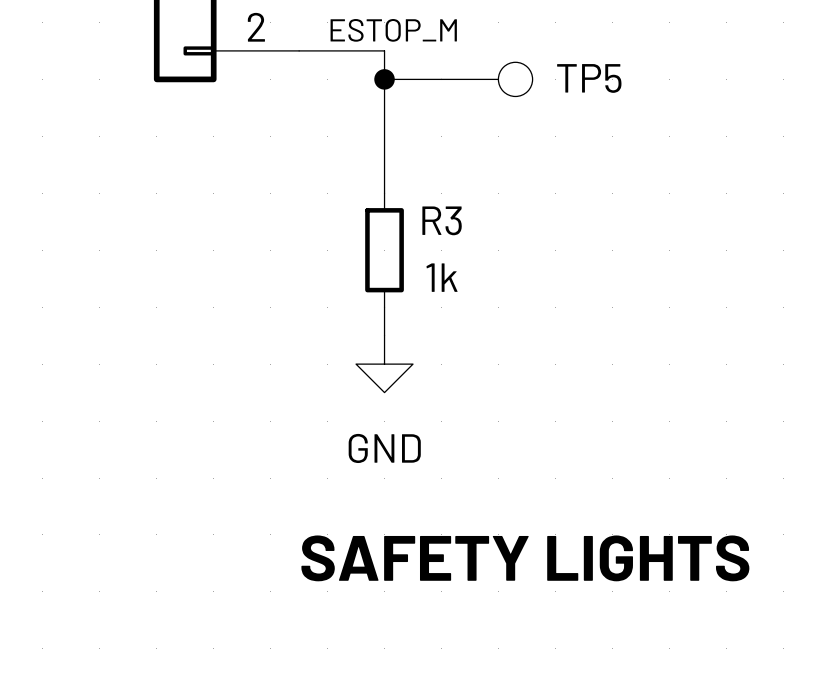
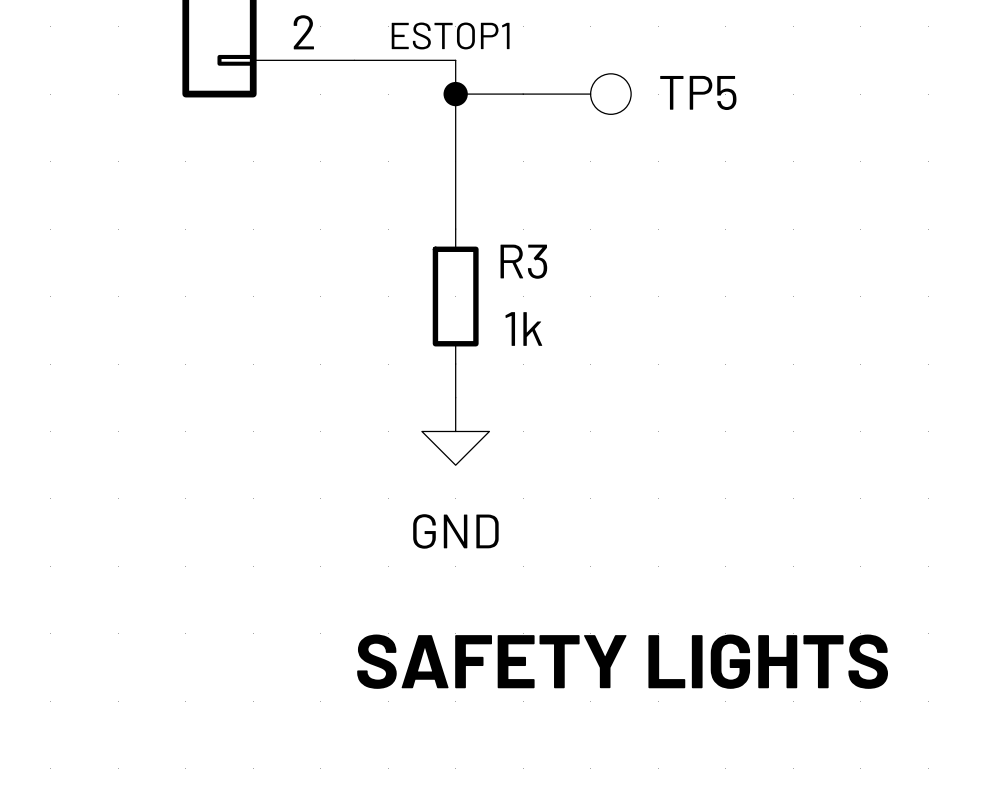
label: ESTOP_M (393, 30) -> ESTOP1 (450, 35)

